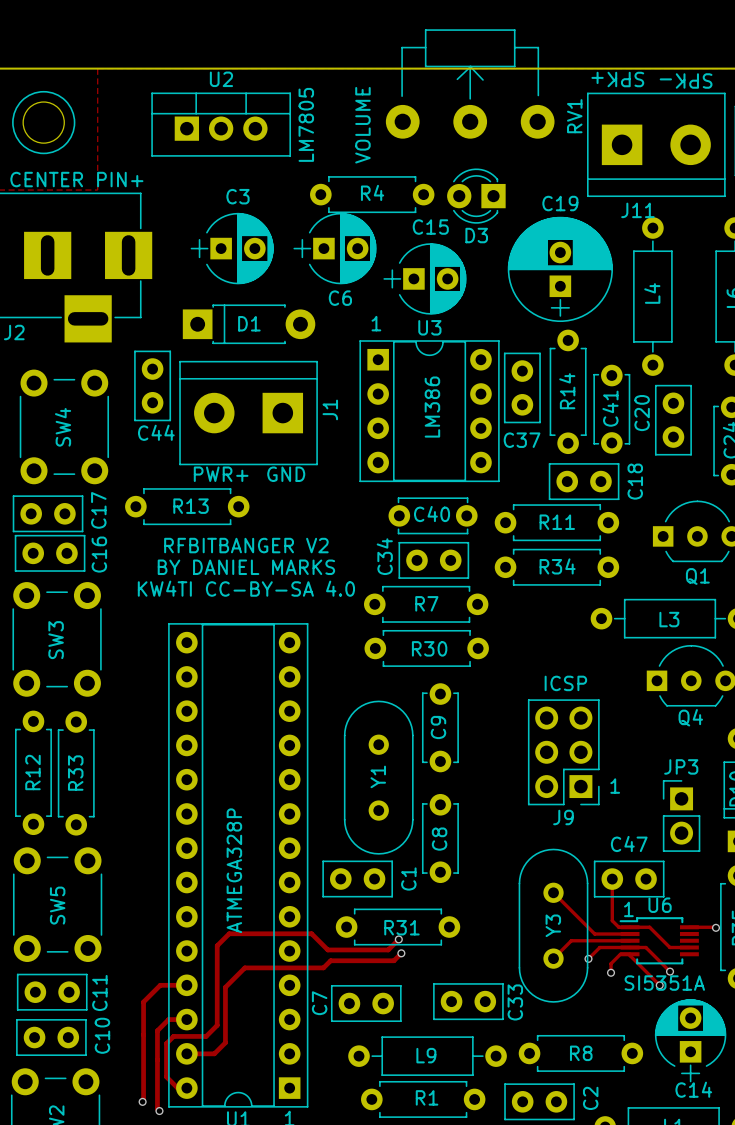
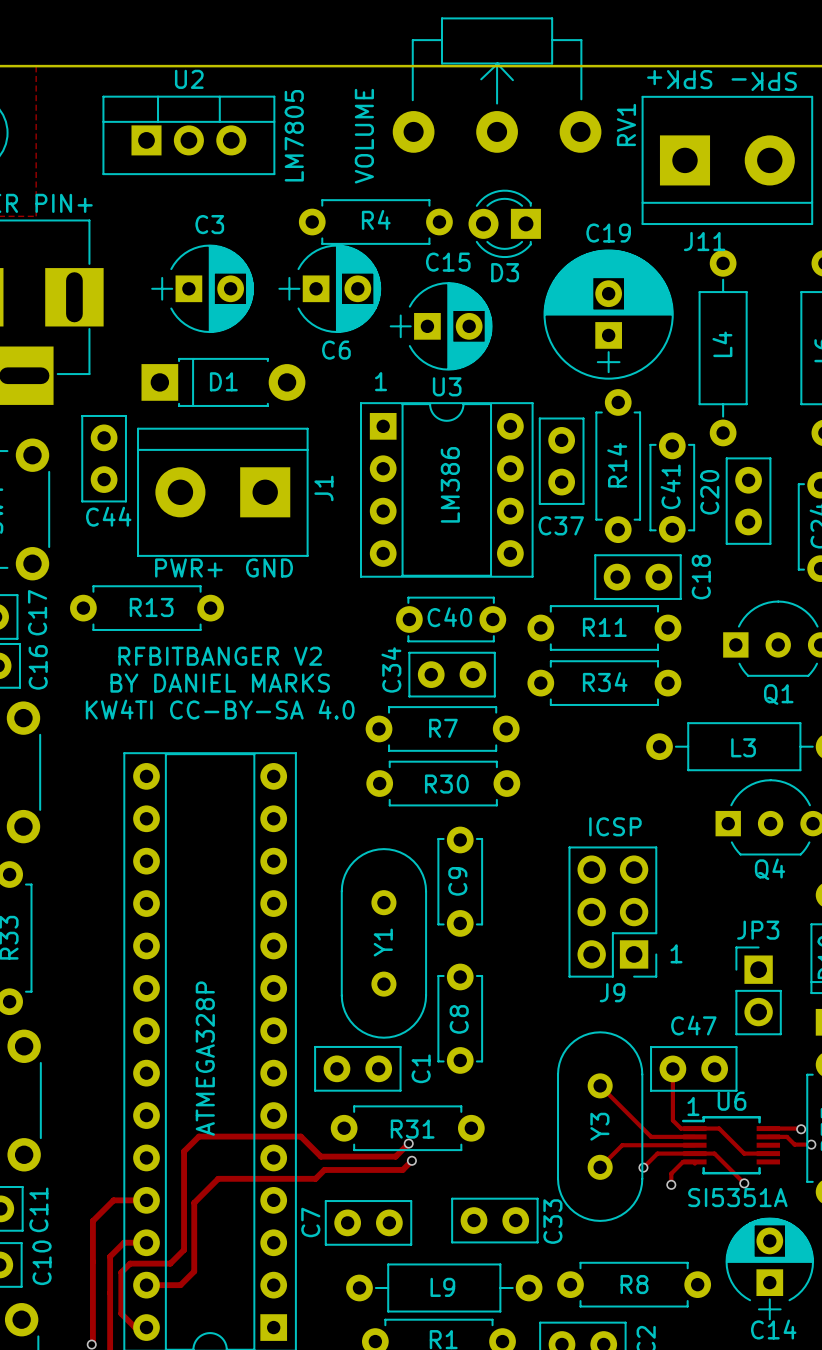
track: none -> (768, 1136) (786, 1136) (794, 1144) (811, 1144)
track: (630, 955) (659, 985) -> none
via position: (659, 985) -> (811, 1144)

